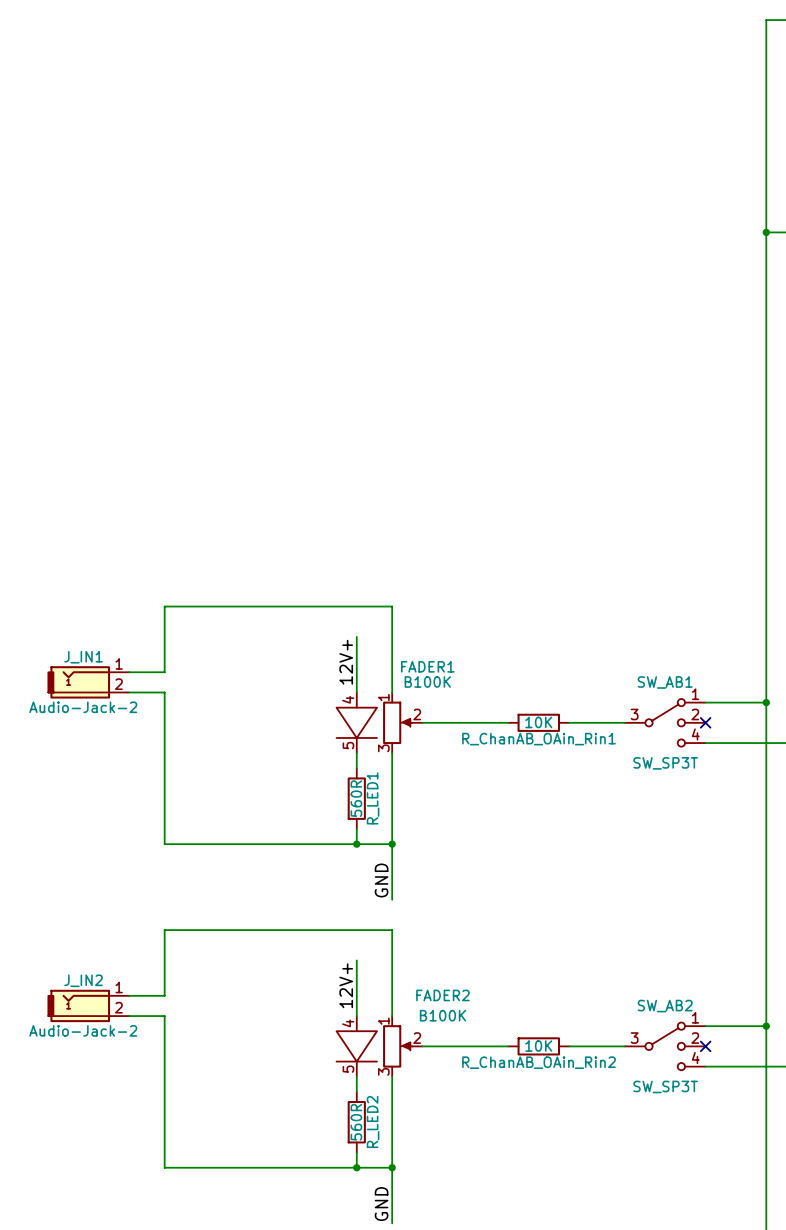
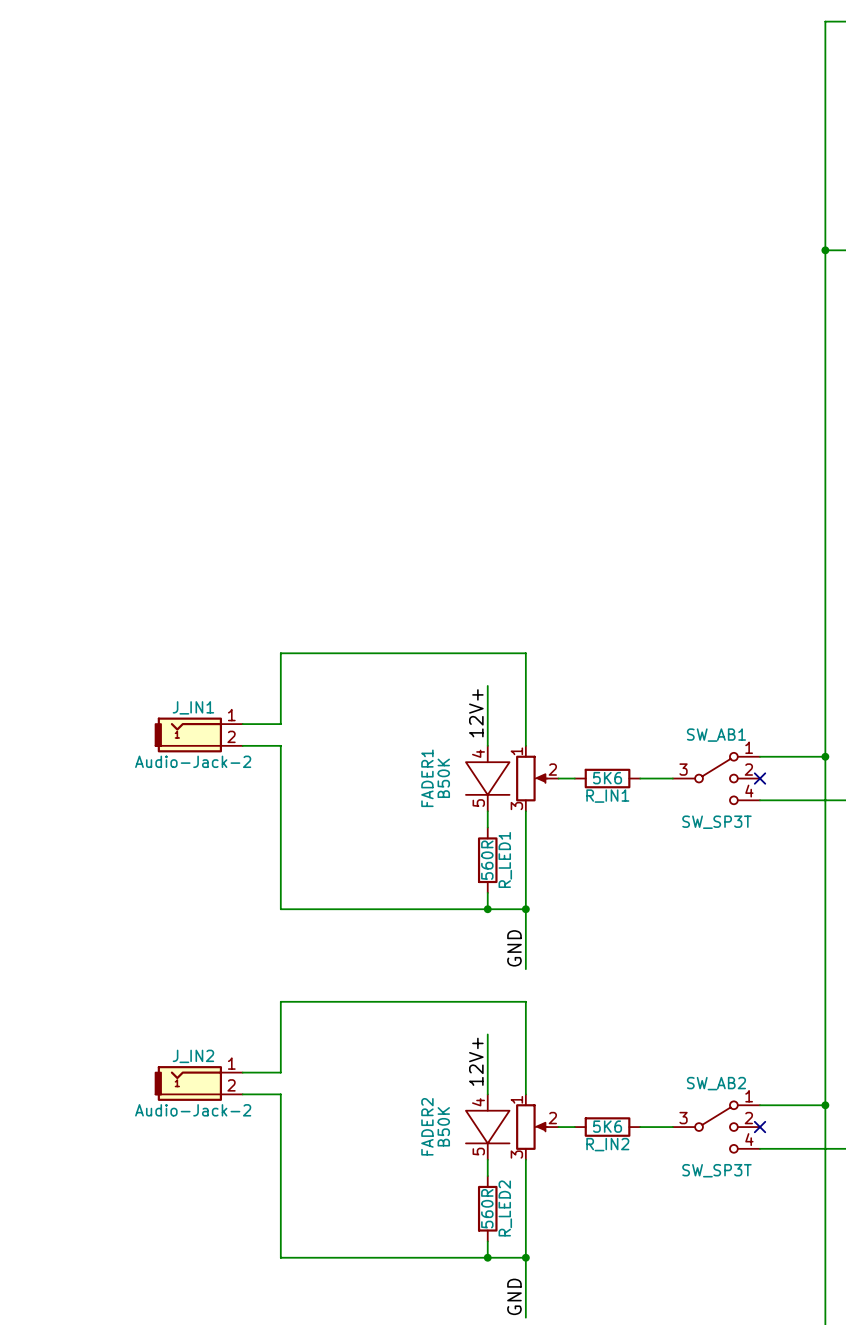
wire: (260, 606) (164, 606) (164, 672) (129, 672) -> (280, 653) (280, 724) (242, 724)
wire: (392, 606) (392, 692) -> (422, 653) (525, 653) (525, 745)
wire: (356, 636) (356, 692) -> (487, 685) (487, 745)
label position: 12V+ (346, 662) -> 12V+ (476, 713)
FADER1 name rotation: 0° (427, 666) -> 90° counterclockwise (427, 778)
J_IN1 position: (88, 682) -> (199, 734)
FADER1 value: B100K (427, 682) -> B50K (443, 778)
wire: (129, 692) (164, 692) (164, 844) (260, 844) -> (242, 745) (280, 745) (280, 909)
FADER1 position: (379, 722) -> (512, 778)
wire: (422, 722) (508, 722) -> none
wire: none -> (558, 778) (574, 778)
R_ChanAB_OAin_Rin1: 10K (538, 722) -> none
R_IN1: none -> 5K6 (607, 778)
wire: (356, 753) (356, 768) -> (487, 811) (487, 827)
wire: (392, 753) (392, 899) -> (525, 811) (525, 969)
R_LED1 position: (356, 798) -> (487, 860)
wire: (356, 828) (356, 844) -> (487, 892) (487, 909)
junction: (356, 844) -> none
wire: none -> (422, 909) (525, 909)
junction: (392, 844) -> none
junction: none -> (487, 909)
junction: none -> (525, 909)
label position: GND (381, 880) -> GND (514, 948)
wire: (260, 930) (164, 930) (164, 995) (129, 995) -> (280, 1001) (280, 1072) (242, 1072)
wire: (392, 930) (392, 1016) -> (422, 1001) (525, 1001) (525, 1094)
wire: (356, 960) (356, 1016) -> (487, 1034) (487, 1094)
label position: 12V+ (346, 985) -> 12V+ (476, 1061)
FADER2 name rotation: 0° (442, 995) -> 90° counterclockwise (427, 1126)
FADER2 name position: FADER2 (442, 995) -> FADER2 (427, 1126)
J_IN2 position: (88, 1005) -> (199, 1083)
FADER2 value: B100K (442, 1015) -> B50K (443, 1126)
wire: (129, 1016) (164, 1016) (164, 1167) (260, 1167) -> (242, 1094) (280, 1094) (280, 1257)
FADER2 position: (379, 1046) -> (512, 1127)
wire: (422, 1046) (508, 1046) -> none
wire: none -> (558, 1127) (574, 1127)
R_ChanAB_OAin_Rin2: 10K (538, 1046) -> none
R_IN2: none -> 5K6 (607, 1127)
wire: (356, 1076) (356, 1091) -> (487, 1159) (487, 1176)
wire: (392, 1076) (392, 1223) -> (525, 1159) (525, 1317)
R_LED2 position: (356, 1122) -> (487, 1208)
wire: (356, 1152) (356, 1167) -> (487, 1241) (487, 1257)
junction: (356, 1167) -> none
wire: none -> (422, 1257) (525, 1257)
junction: (392, 1167) -> none
junction: none -> (487, 1257)
junction: none -> (525, 1257)
label position: GND (381, 1204) -> GND (514, 1296)

